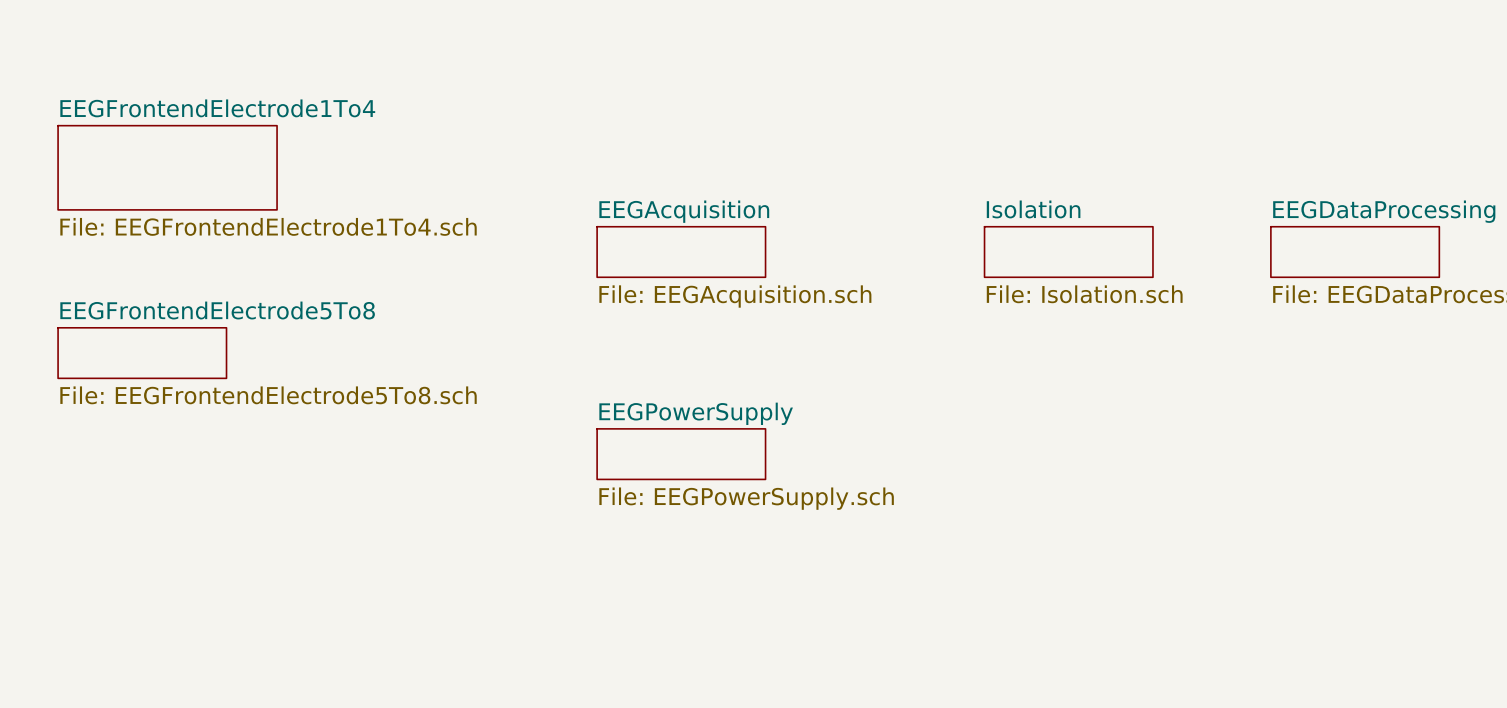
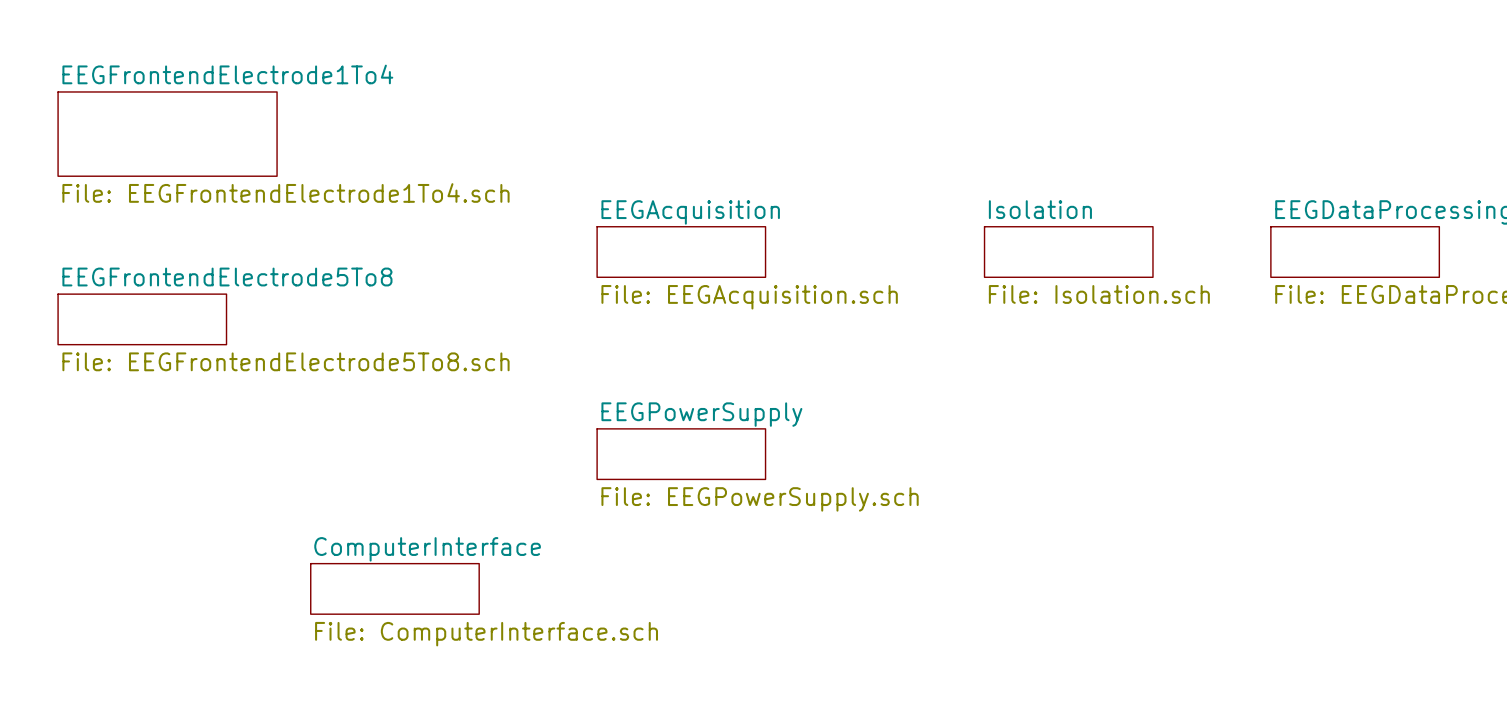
sheet EEGFrontendElectrode1To4 position: (167, 167) -> (167, 134)
sheet EEGFrontendElectrode5To8 position: (142, 353) -> (142, 319)
sheet ComputerInterface: none -> File: ComputerInterface.sch (394, 588)

